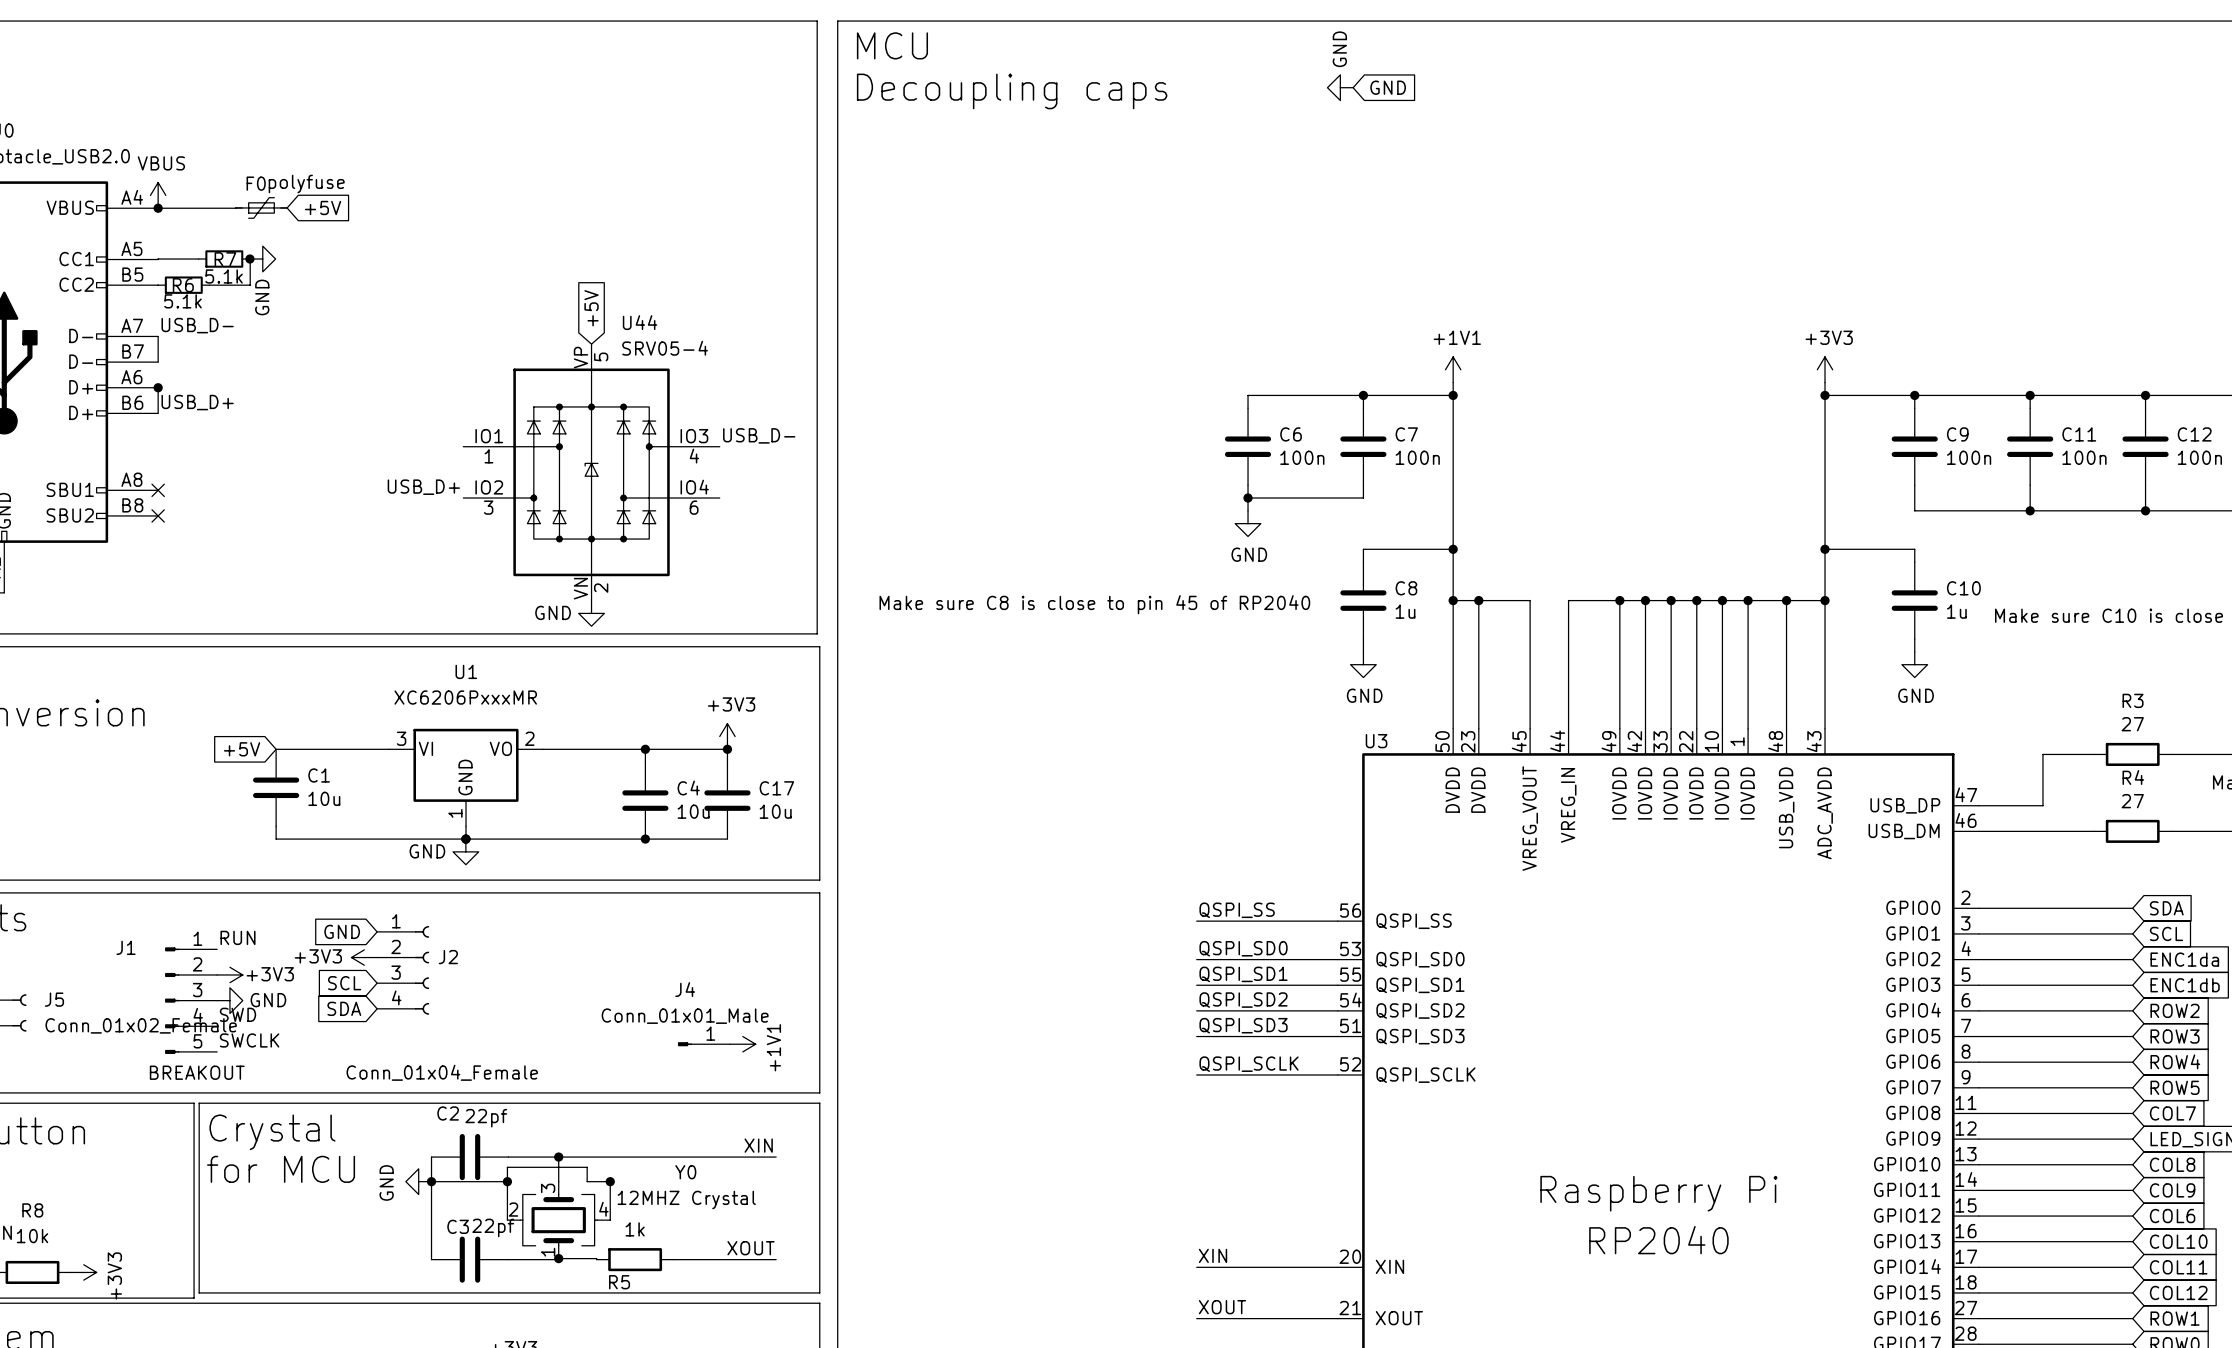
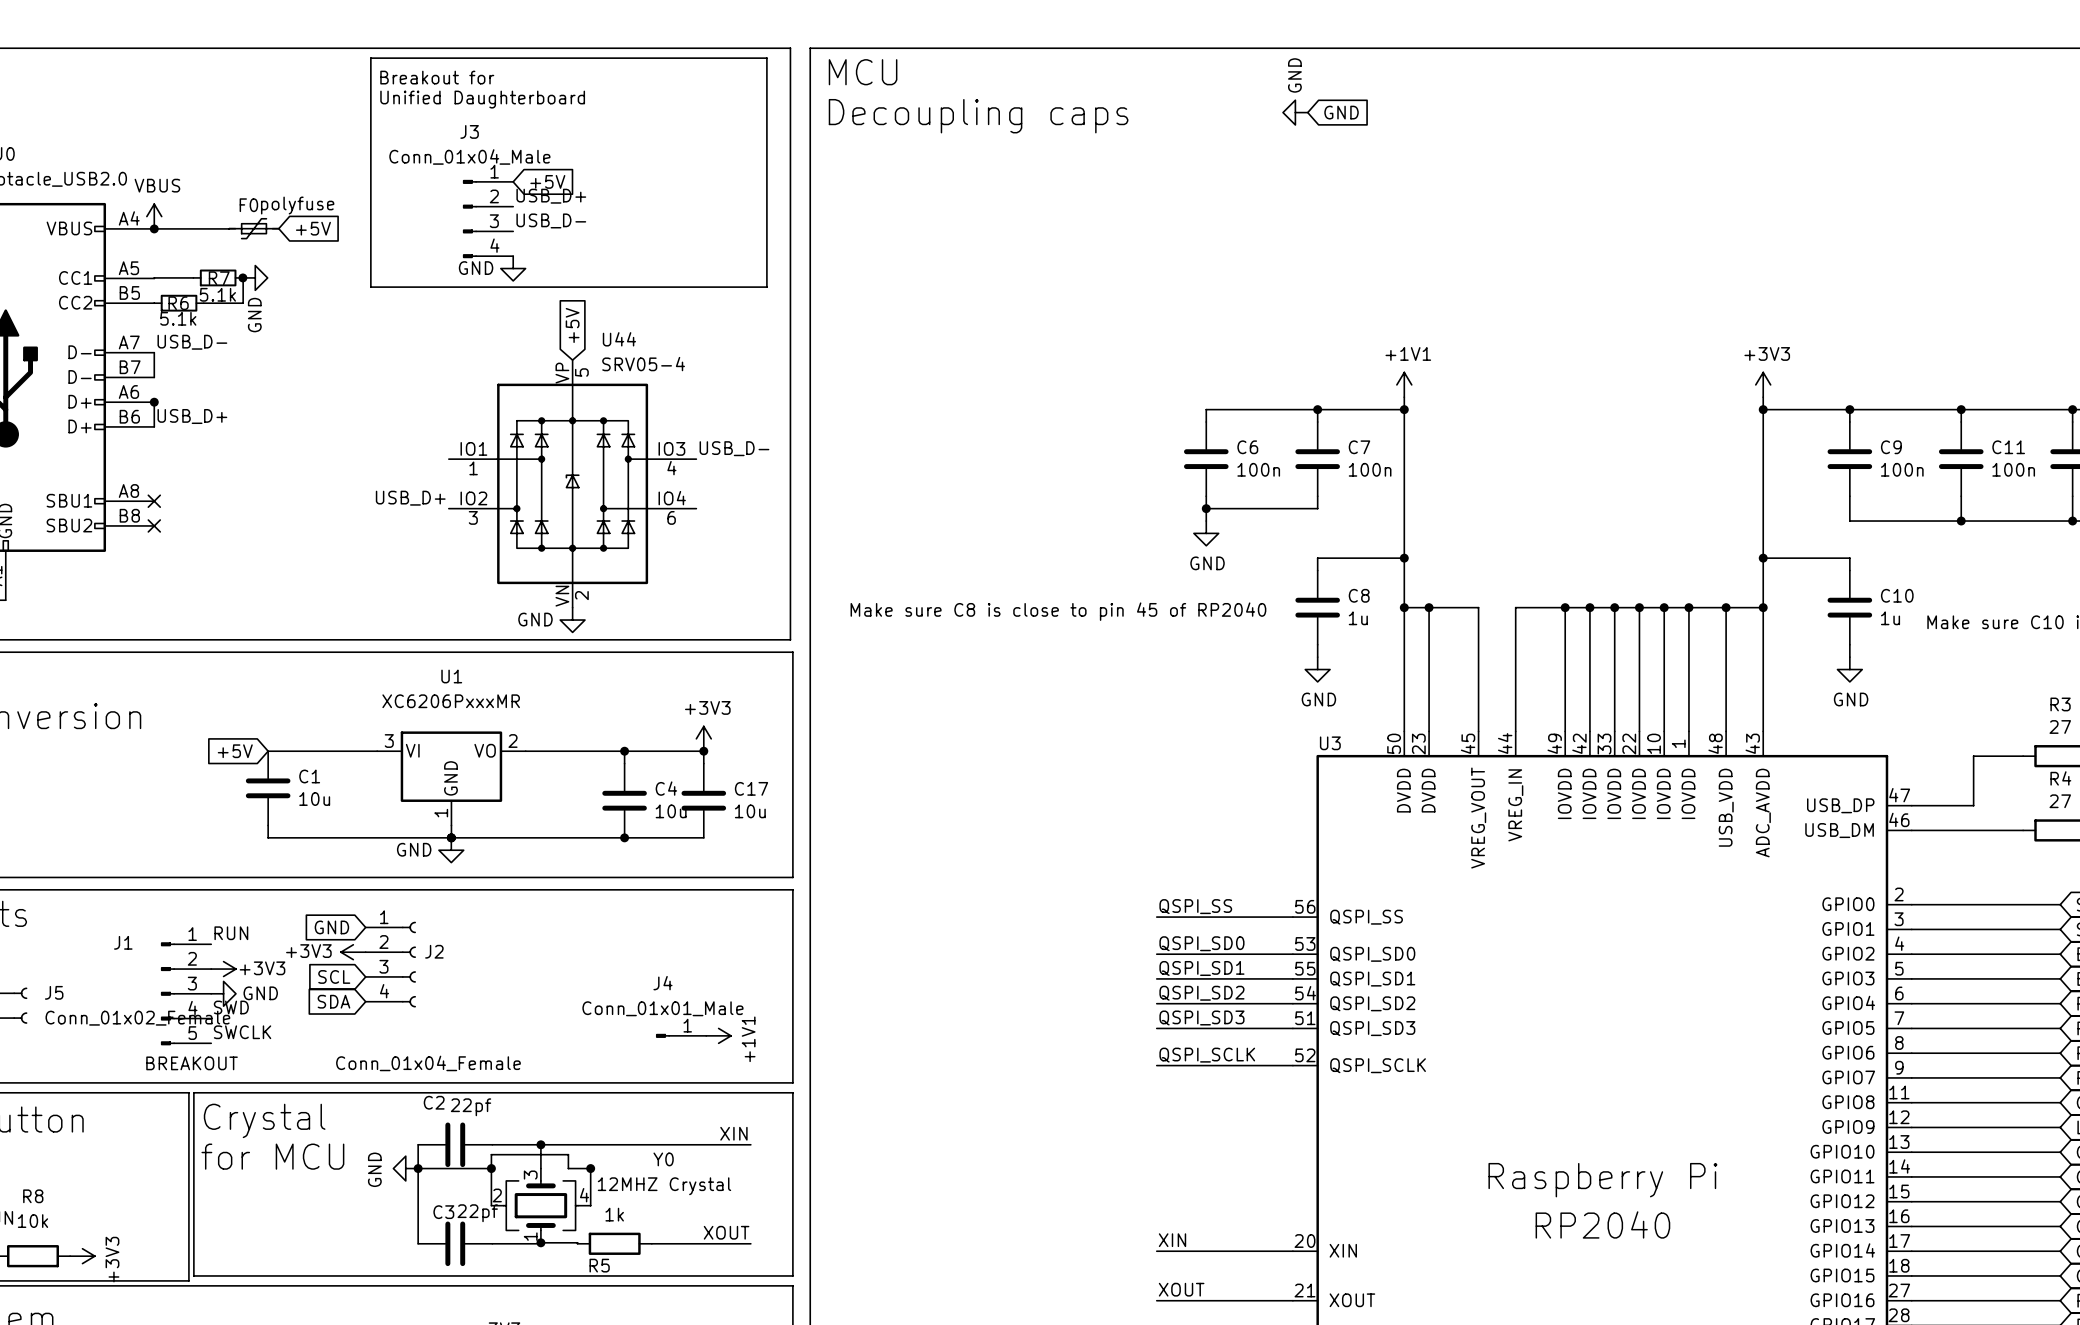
line: none -> (370, 58) (370, 287) (766, 287) (766, 58) (370, 58)
text: none -> Breakout for (437, 77)
text: none -> Unified Daughterboard (482, 99)
global label: none -> +5V (547, 181)
label: none -> USB_D+ (551, 196)
J3: none -> Conn_01x04_Male (488, 219)
label: none -> USB_D- (551, 220)
power symbol: none -> GND (513, 268)

